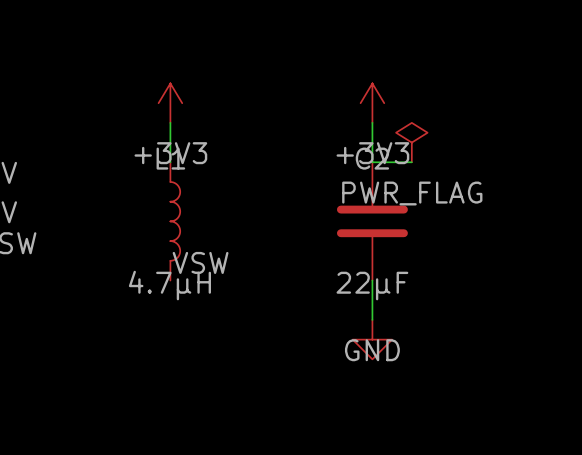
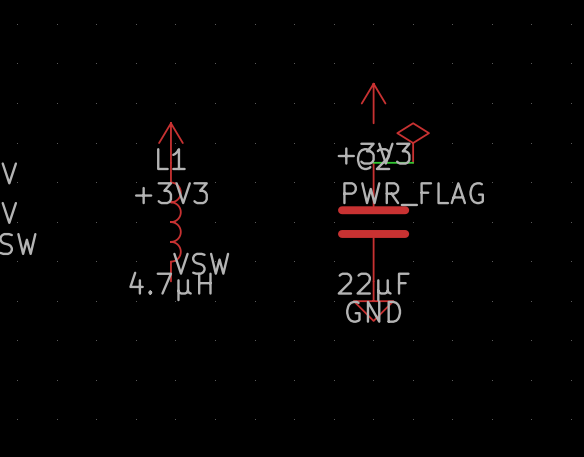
power symbol position: +3V3 (170, 103) -> +3V3 (170, 143)
wire: (372, 122) (372, 162) -> none
power symbol position: GND (372, 339) -> GND (373, 301)

